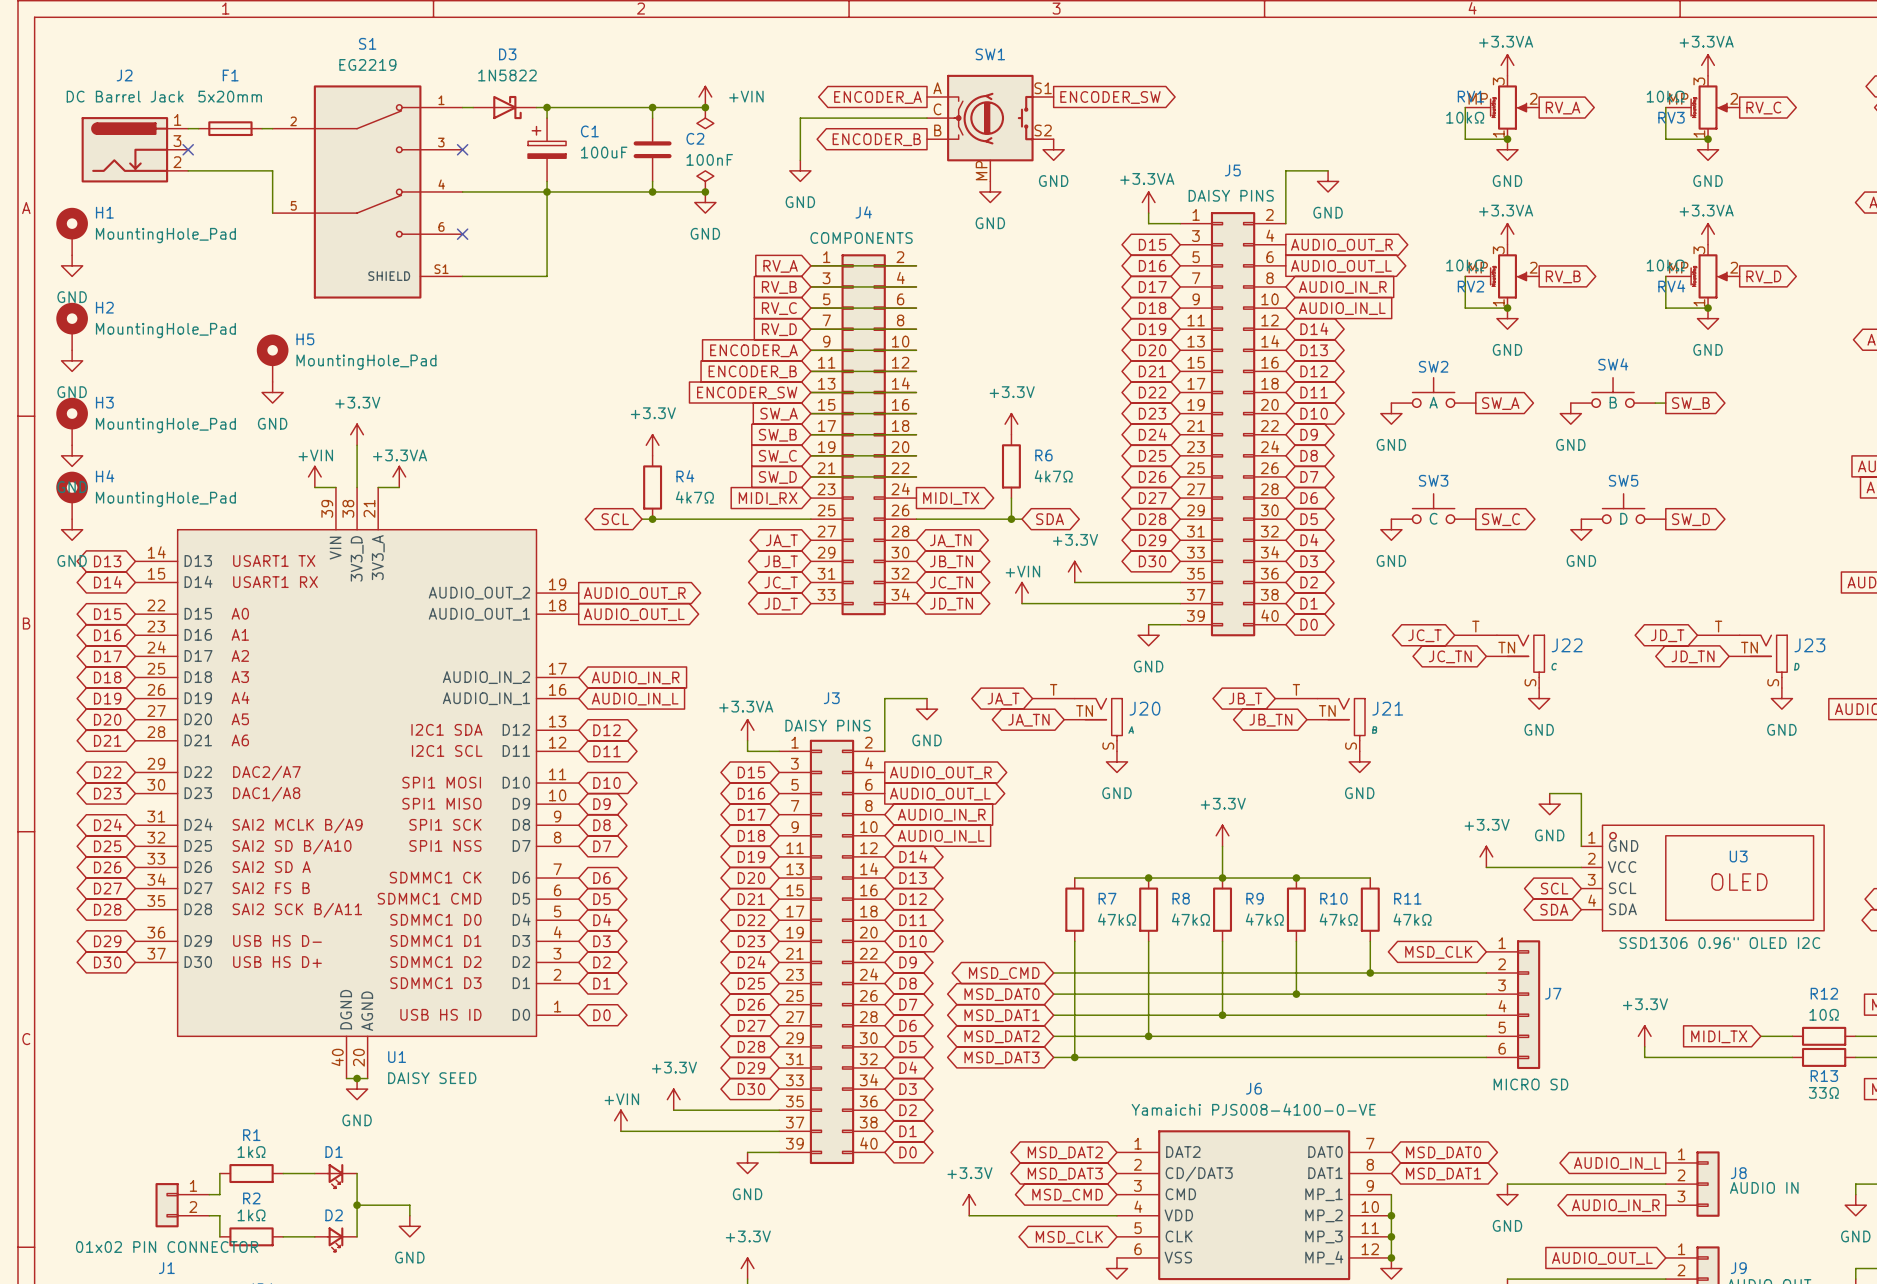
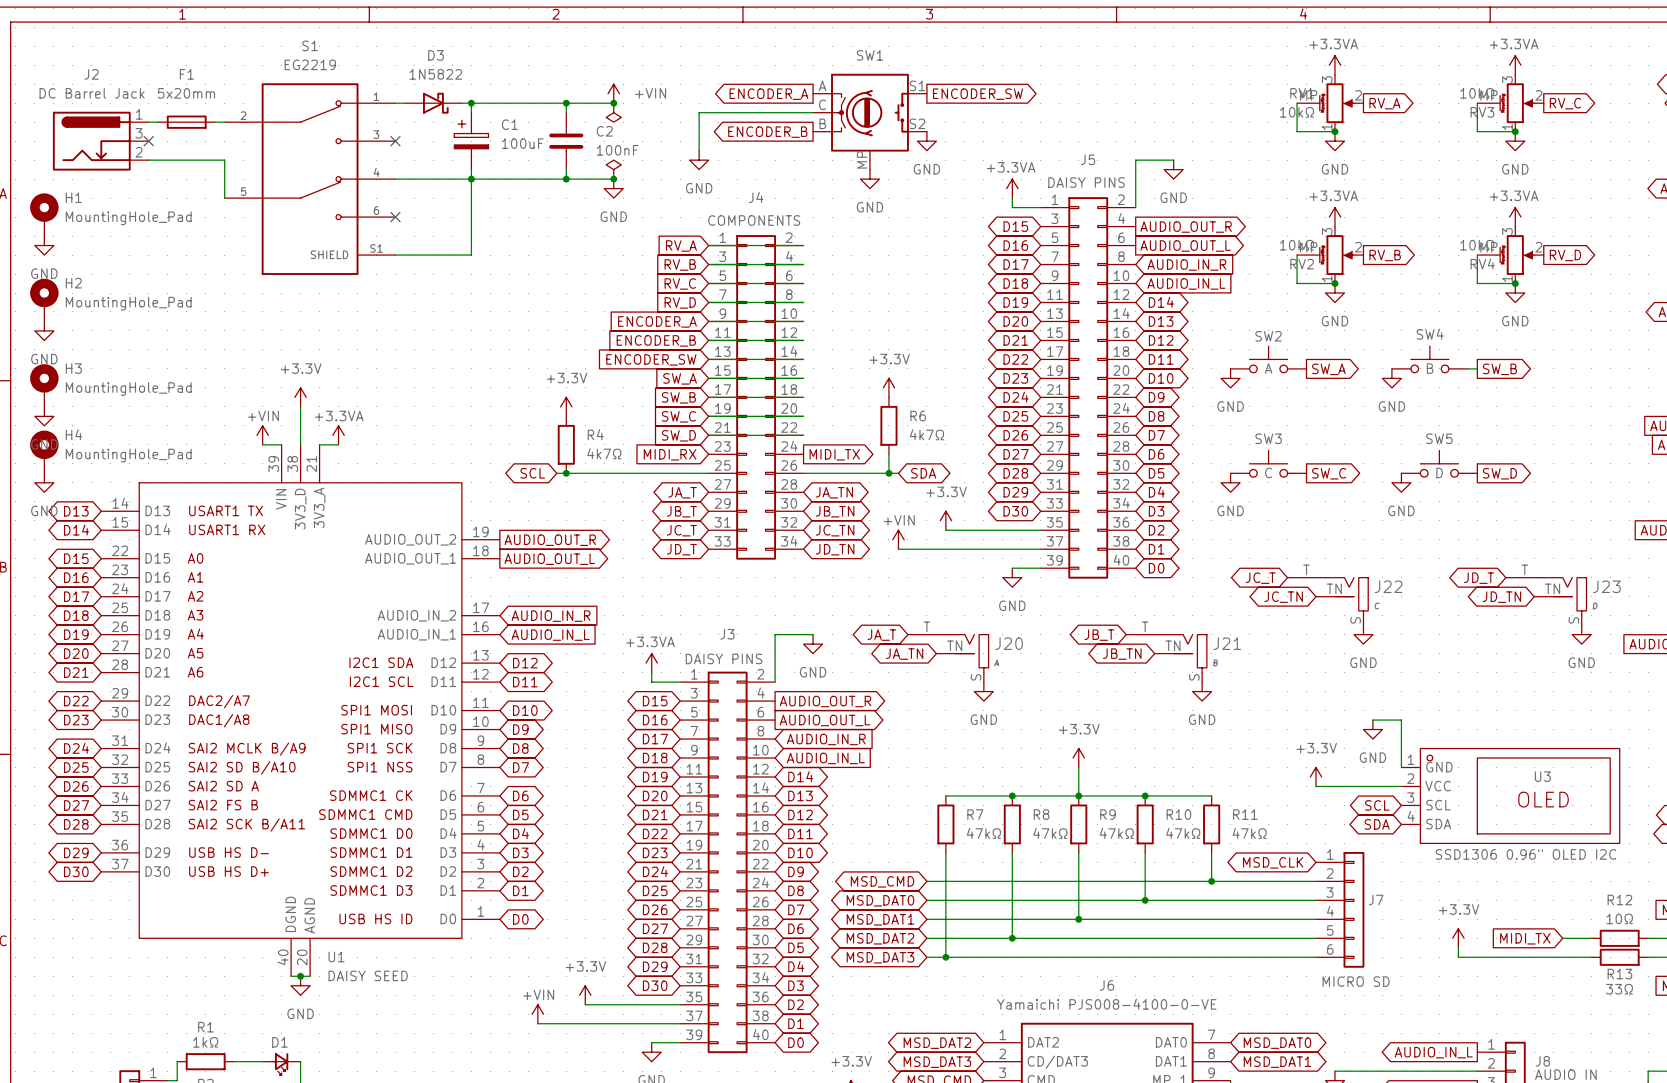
H5: MountingHole_Pad (272, 358) -> none
power symbol: GND (272, 392) -> none

